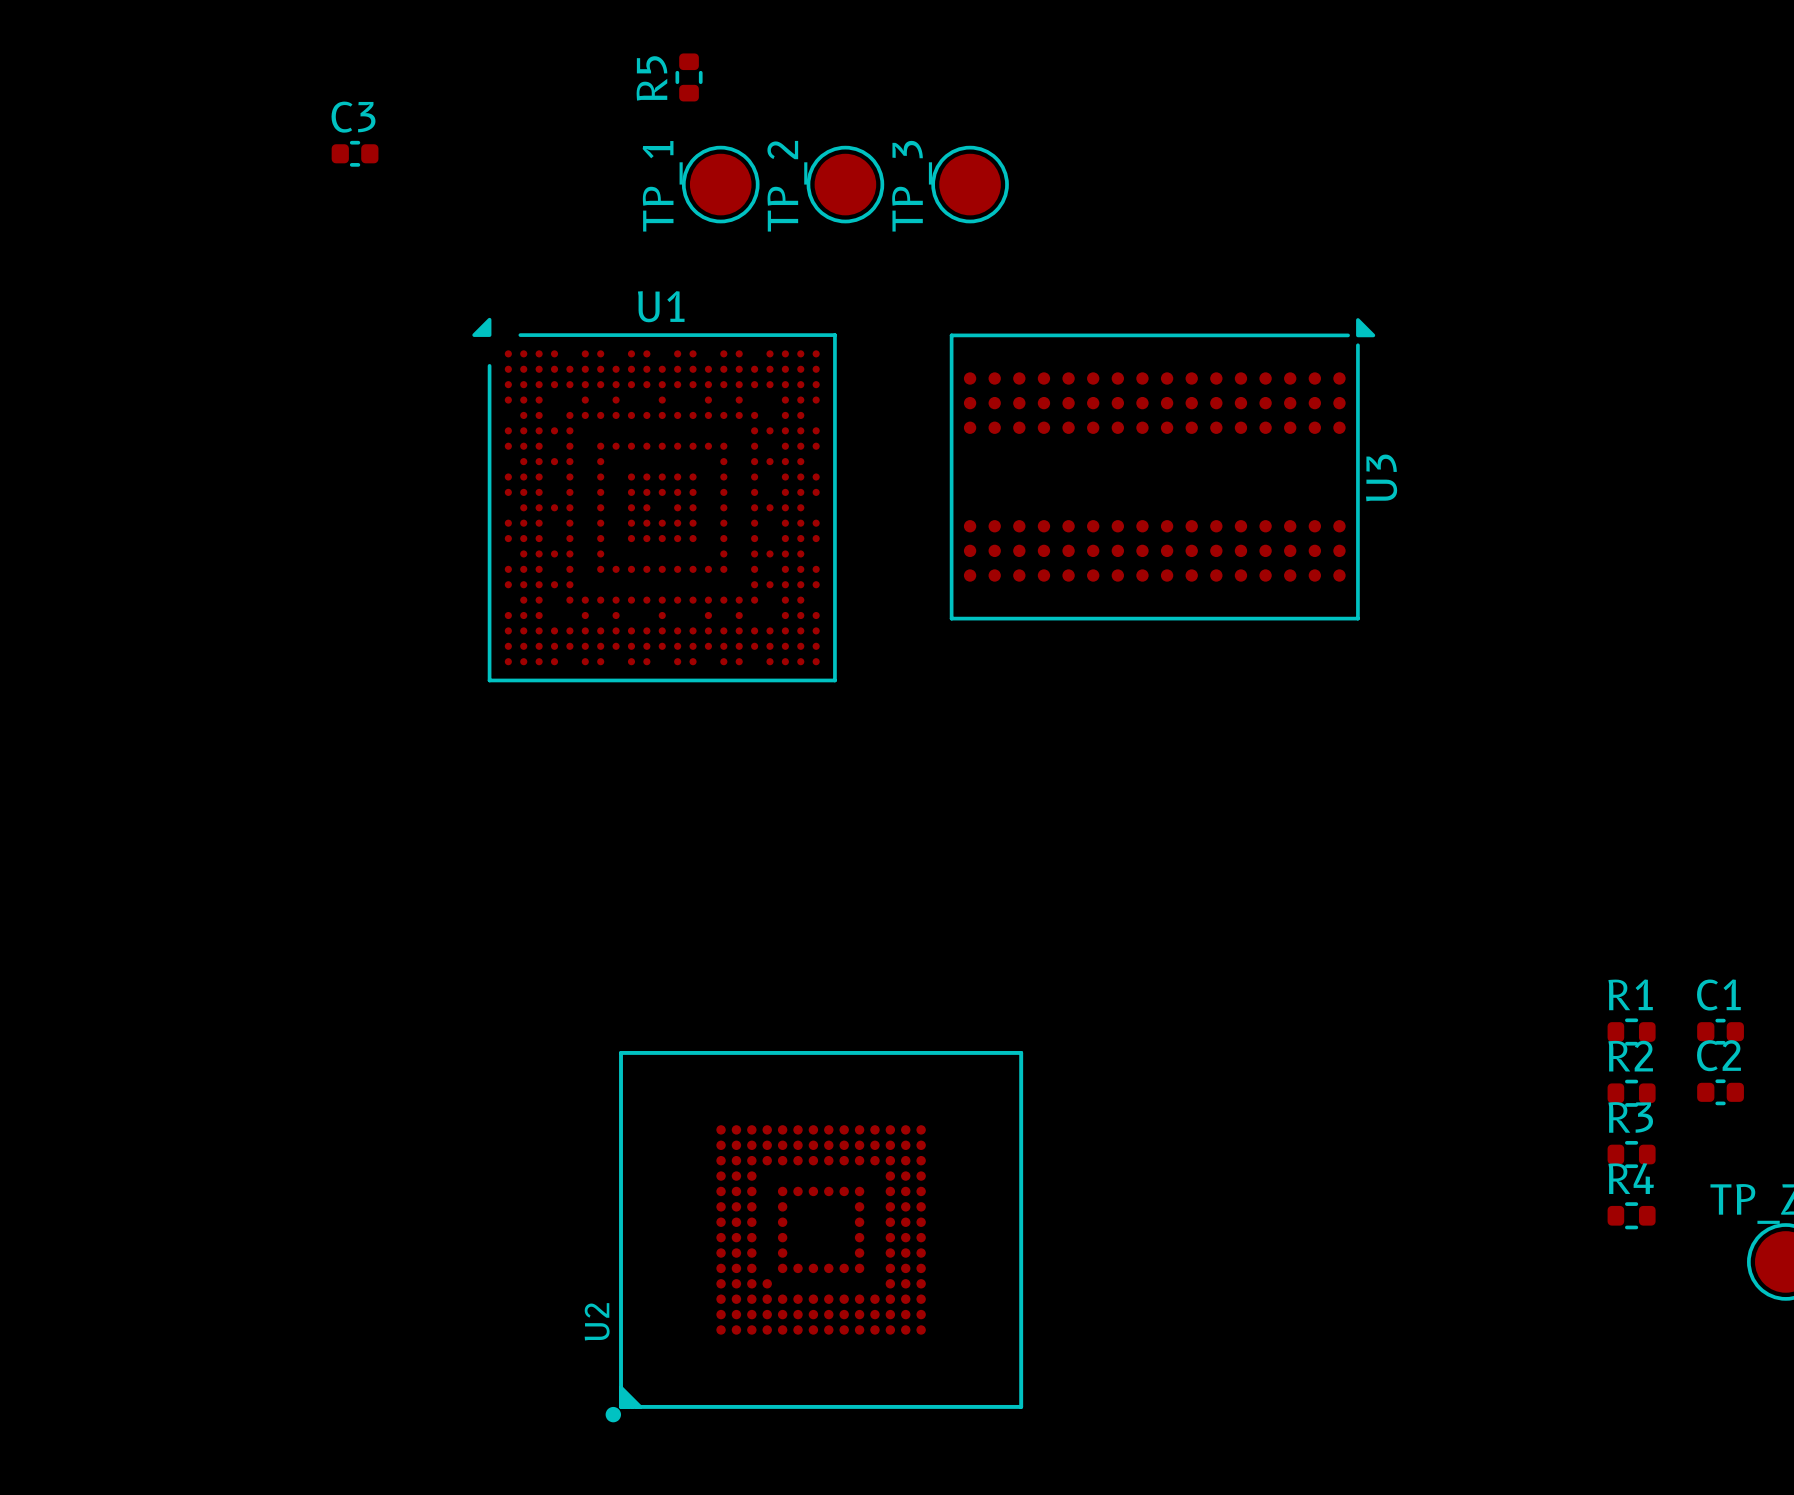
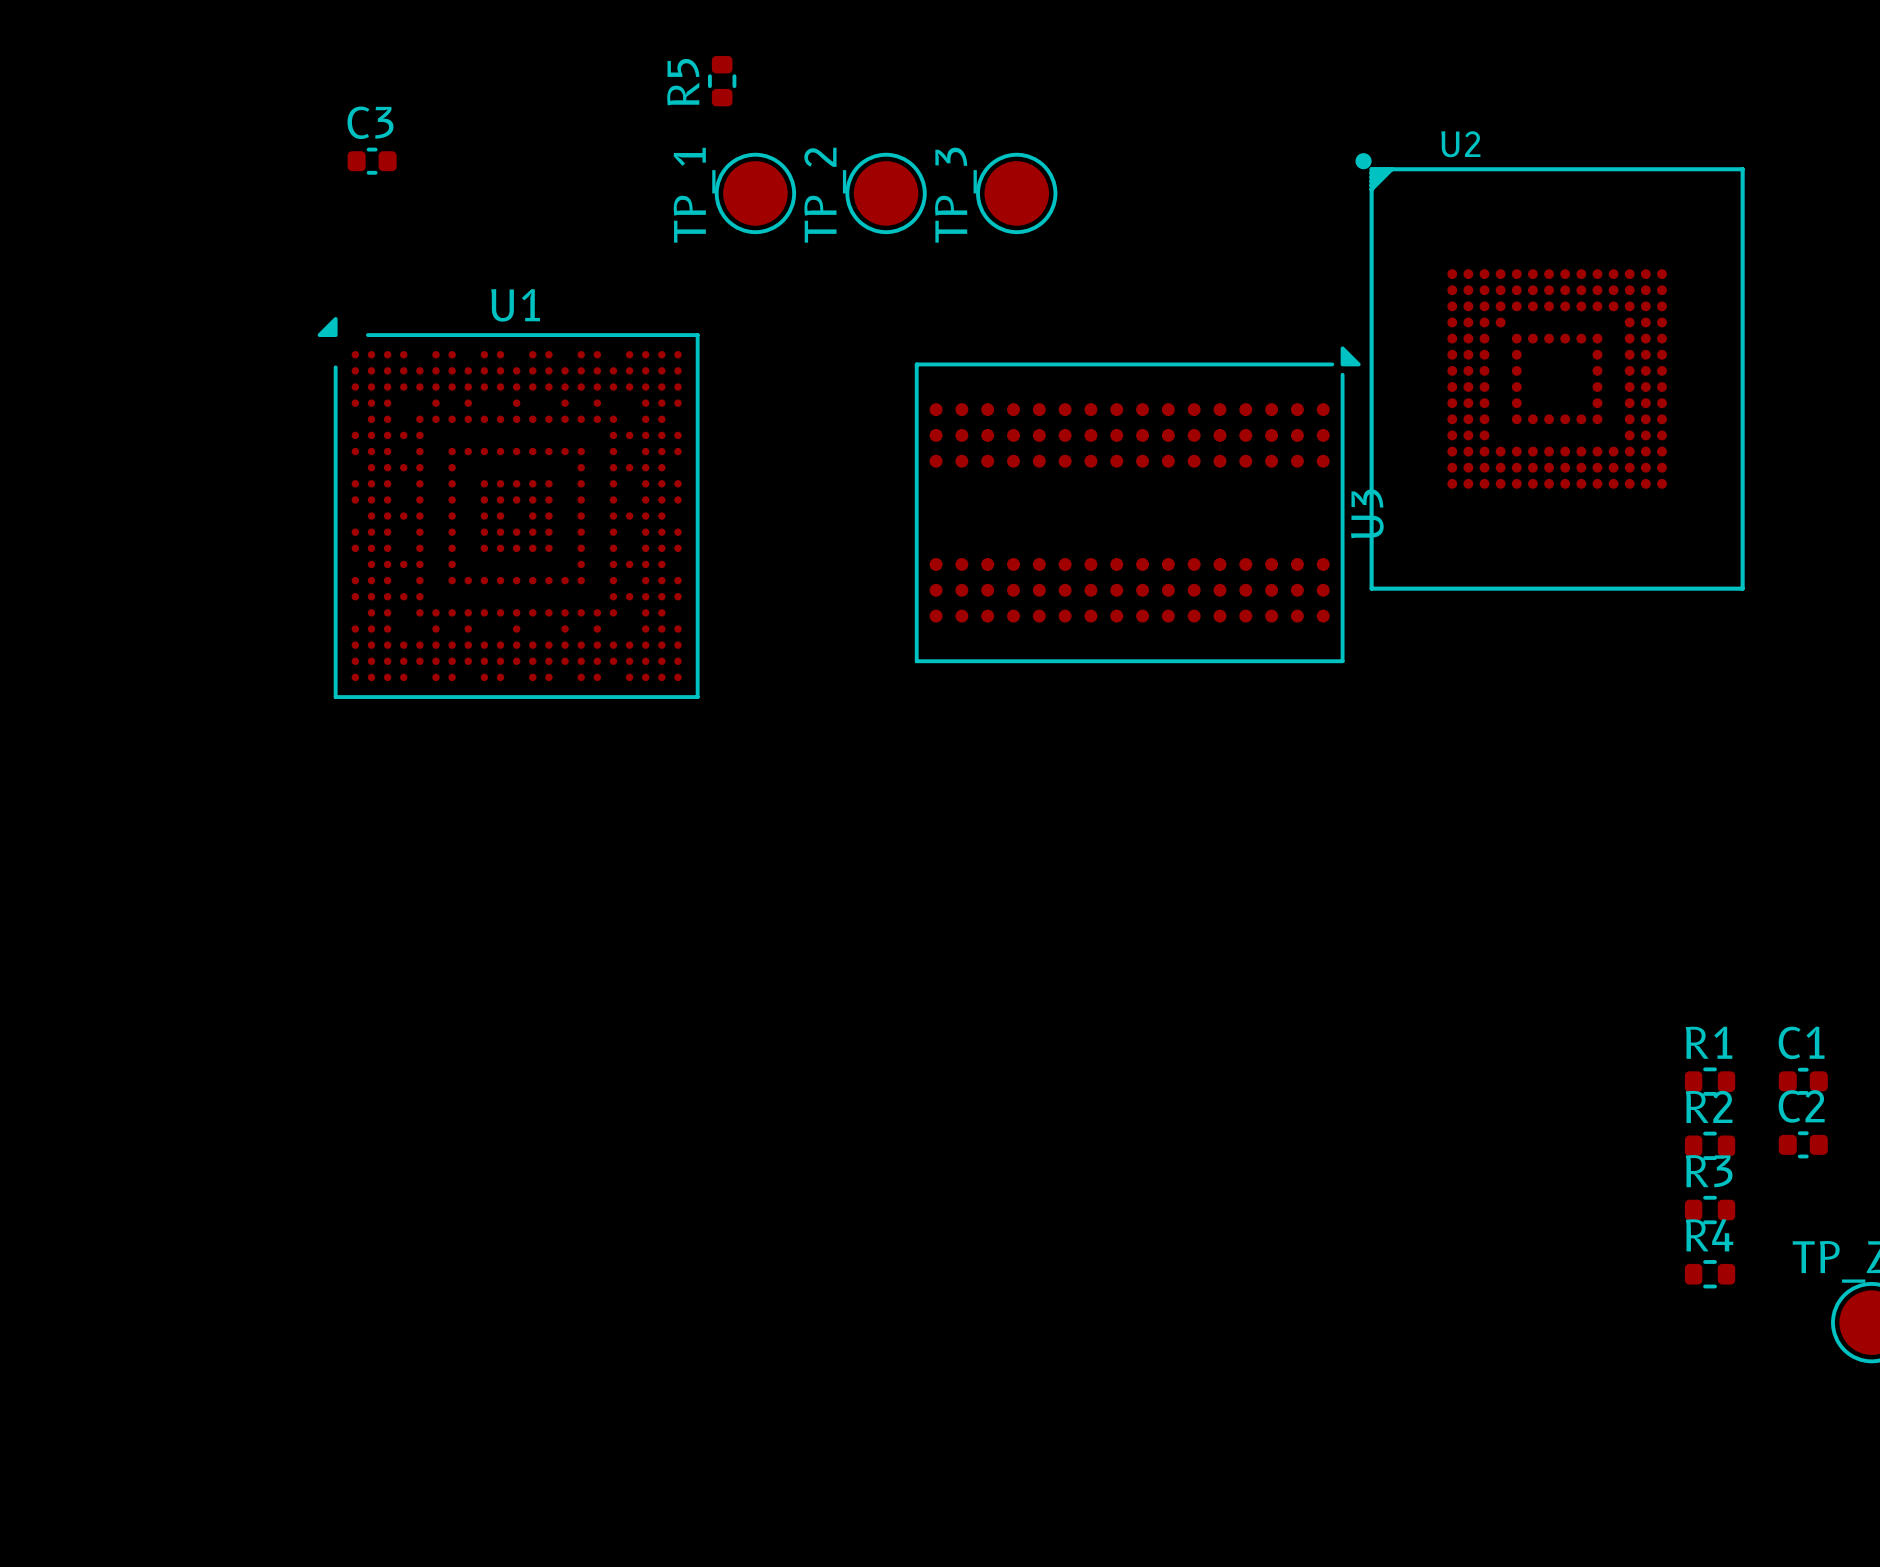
U3 position: (1162, 469) -> (1137, 504)
U1 position: (654, 500) -> (508, 508)
U2 rotation: 0° (814, 1236) -> 90° clockwise (1550, 371)
U2 position: (814, 1236) -> (1550, 371)

